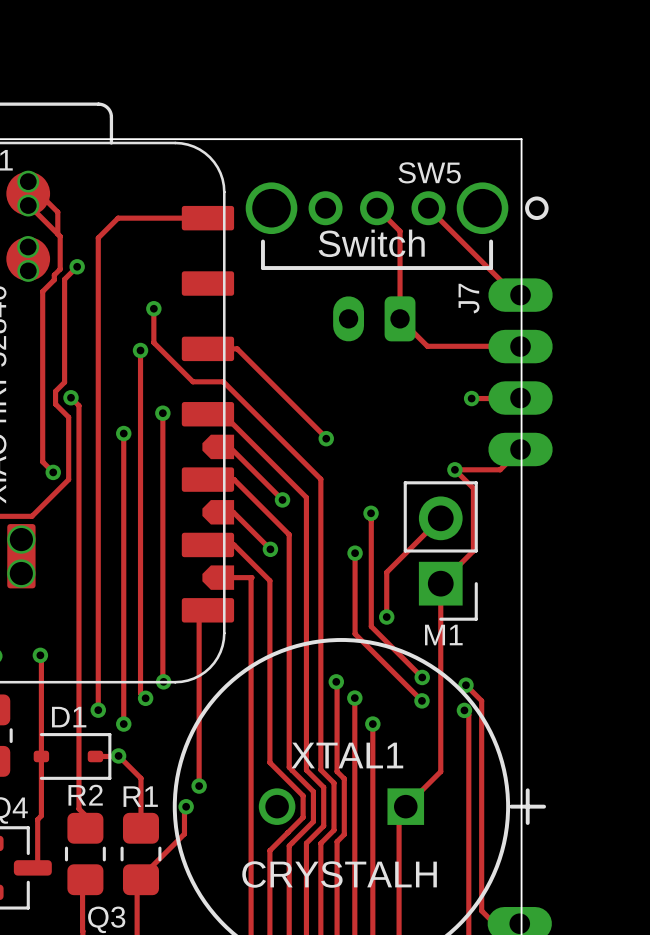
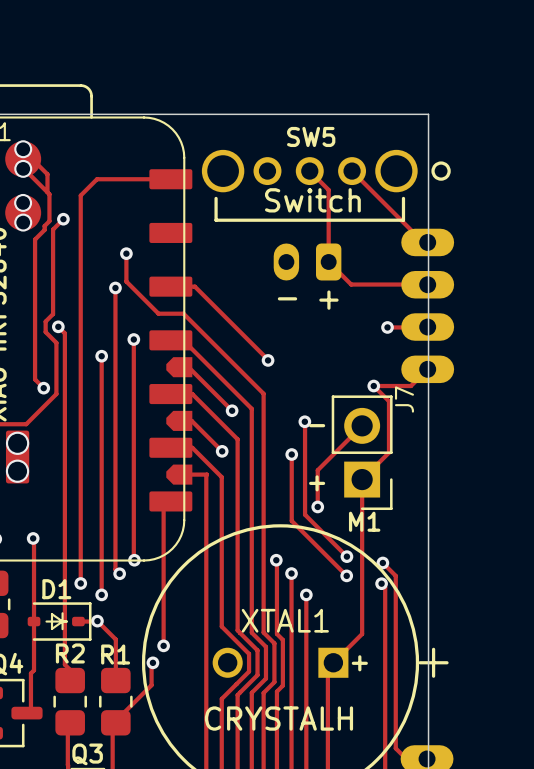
SW5 name position: SW5 (429, 172) -> SW5 (311, 136)
text position: J7 (469, 298) -> J7 (404, 399)
text: none -> + (328, 300)
text: none -> - (287, 298)
text: none -> - (317, 425)
text: none -> + (317, 483)
line: none -> (62, 613) (62, 629)
line: none -> (51, 614) (51, 628) (62, 621) (51, 614)
line: none -> (46, 621) (66, 621)
text: none -> + (359, 663)

